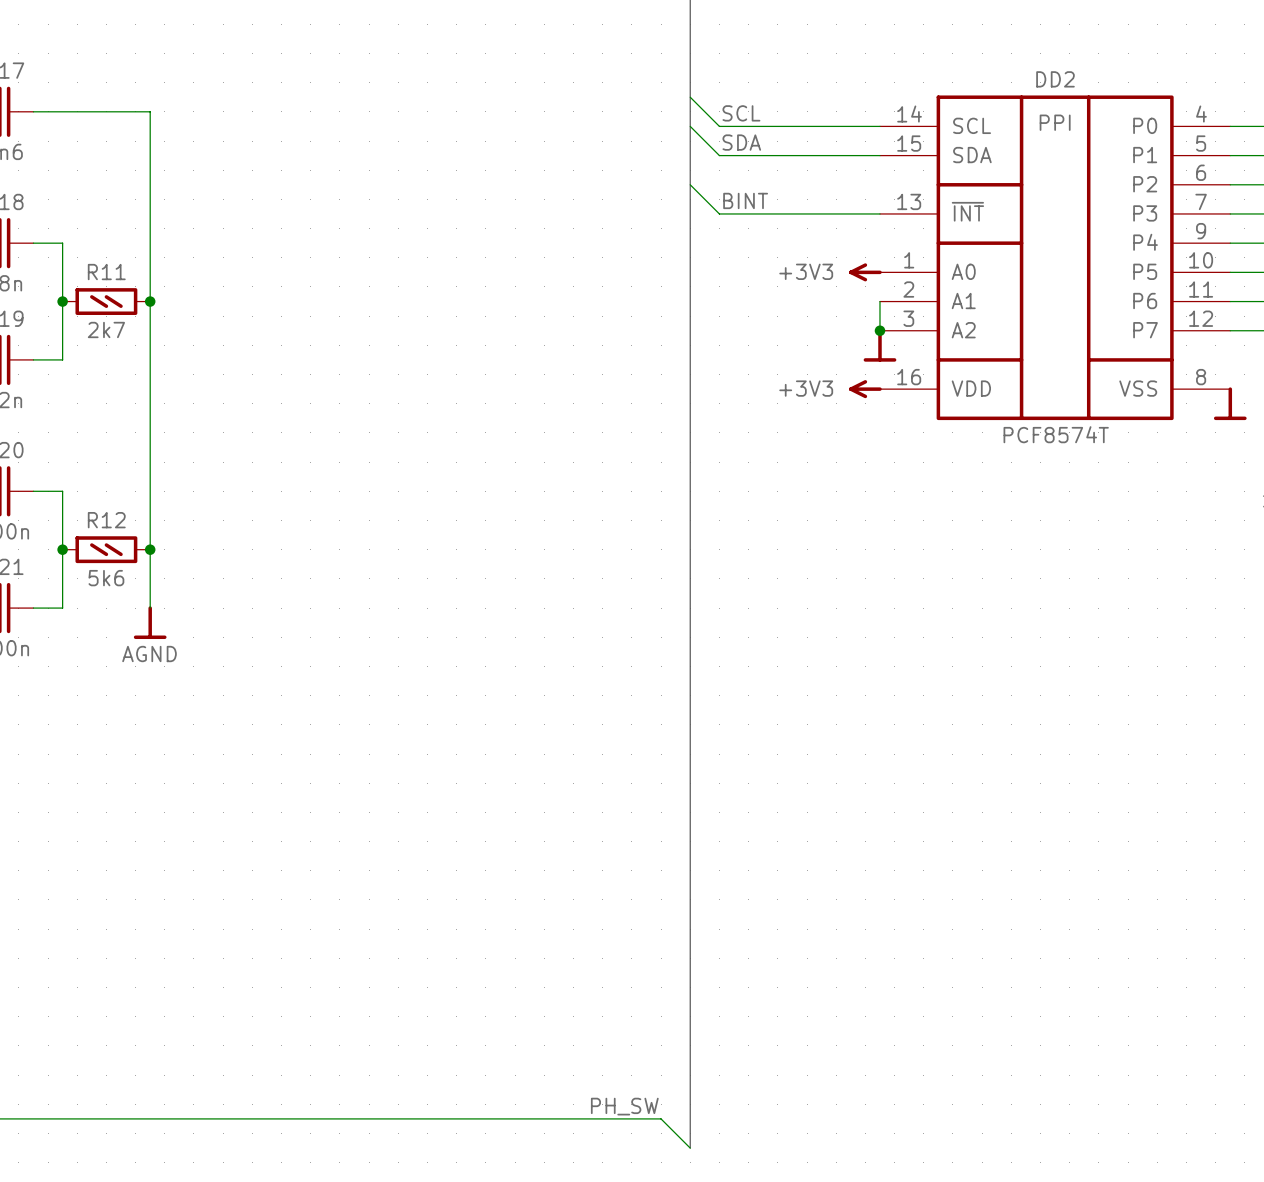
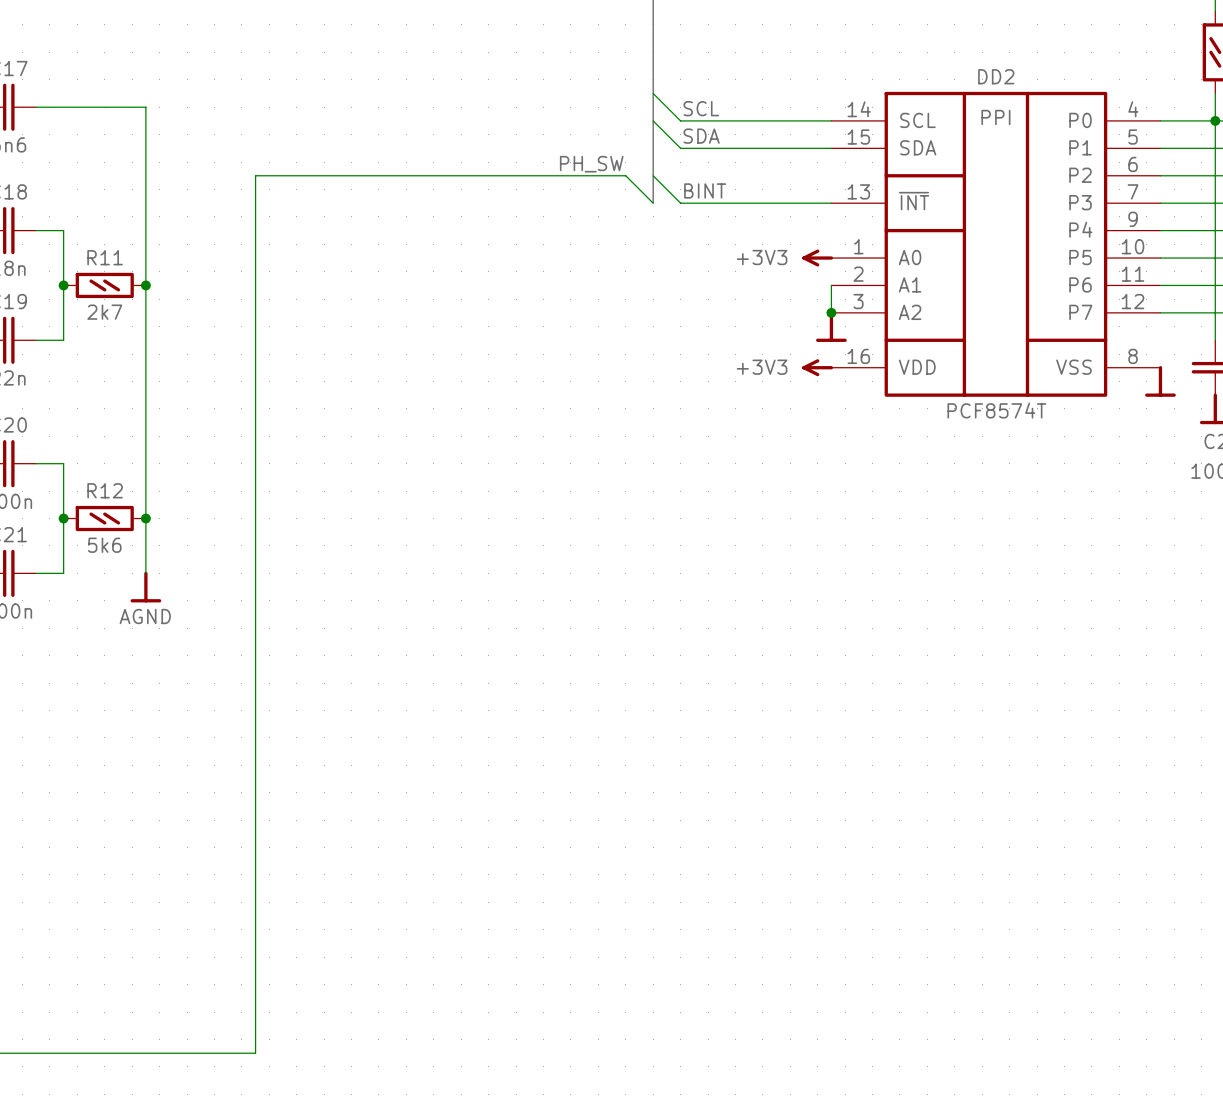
label: none -> PH_SW (591, 164)
bus: (690, 213) (690, 1148) -> none
label: PH_SW (624, 1106) -> none
wire: (266, 1118) (661, 1118) (690, 1148) -> (255, 1053) (255, 175) (625, 175) (653, 203)

